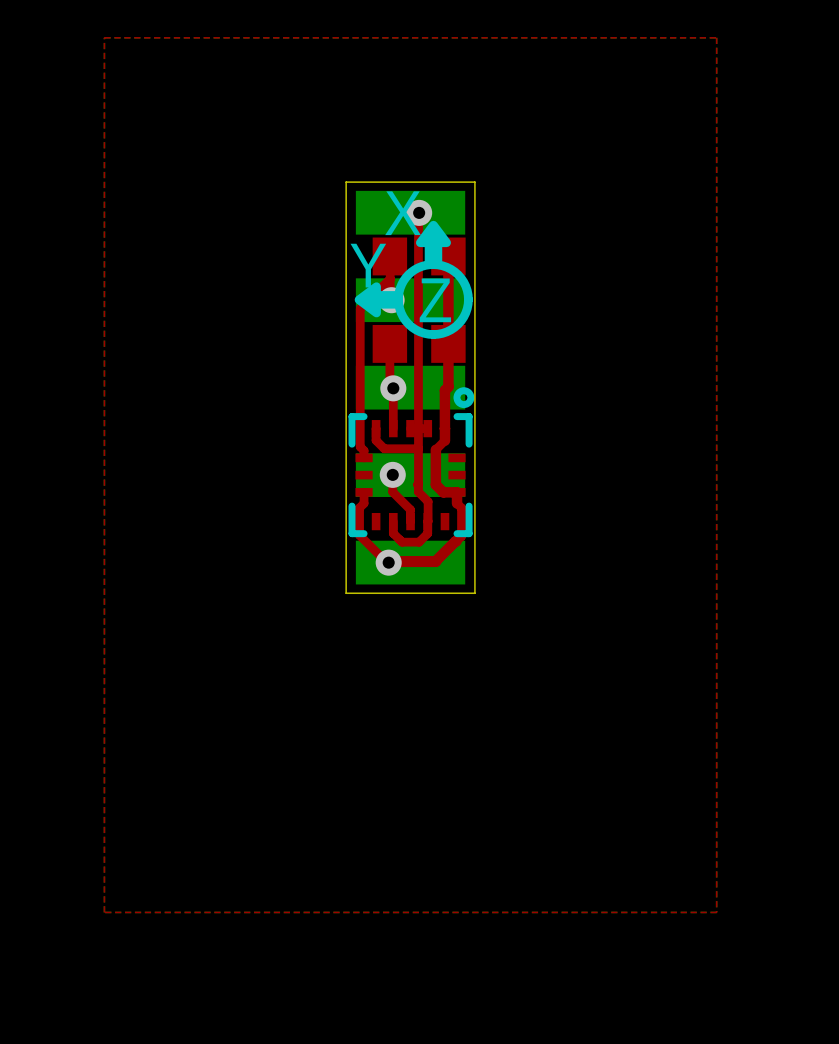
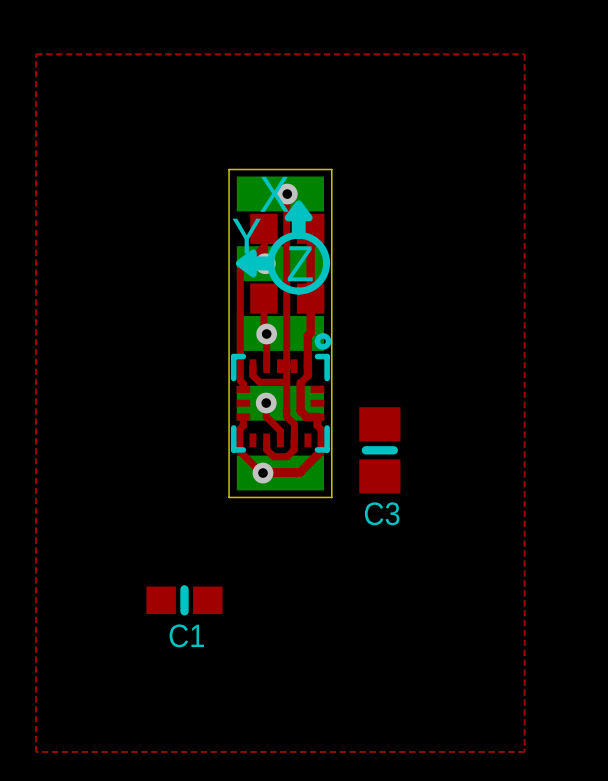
C3: none -> (379, 450)
C1: none -> (184, 600)

